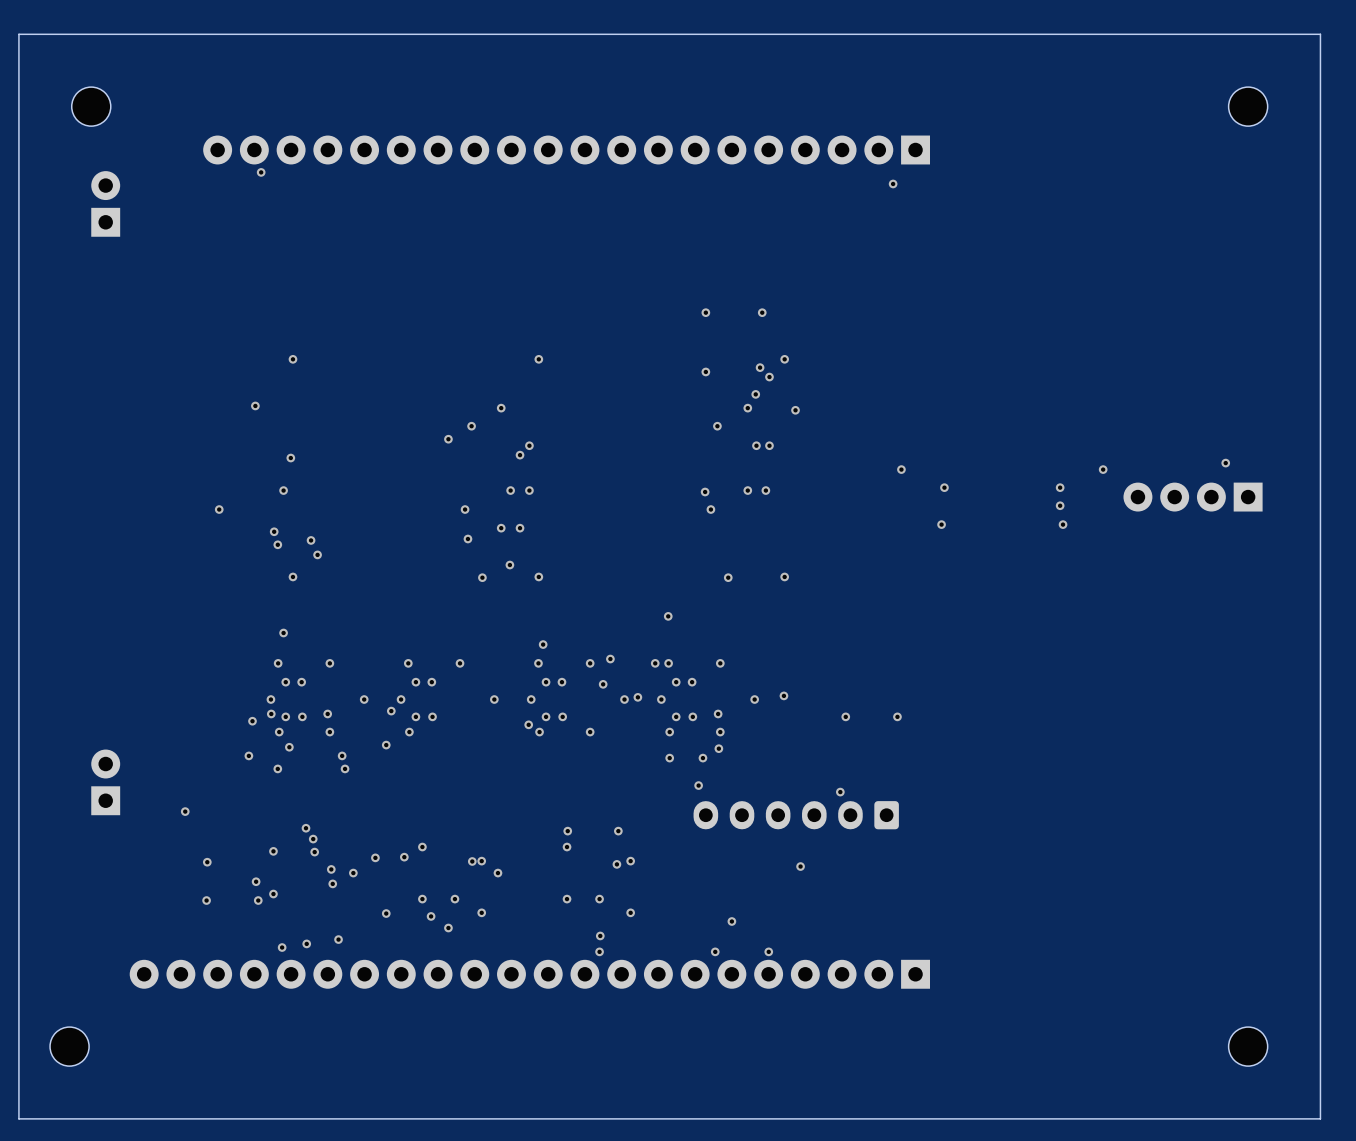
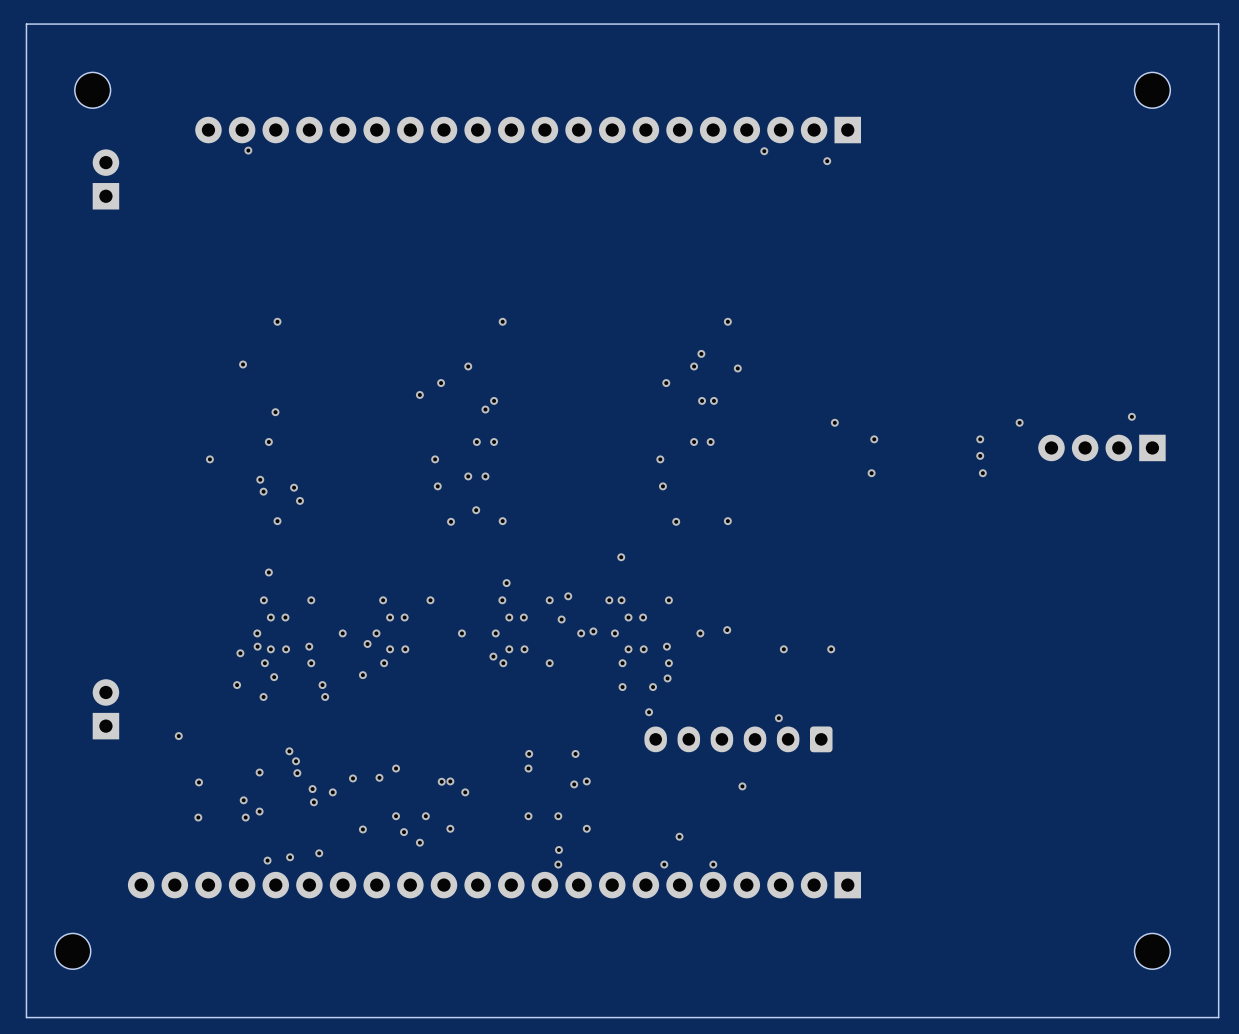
via: none -> (764, 151)
via: (705, 312) -> none
via: (762, 312) -> none
via: (760, 367) -> none
via: (705, 371) -> none
via: (769, 377) -> none
via position: (705, 492) -> (662, 486)

